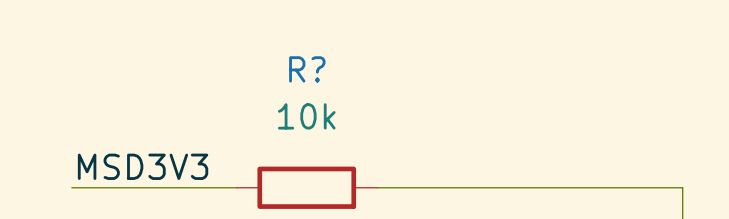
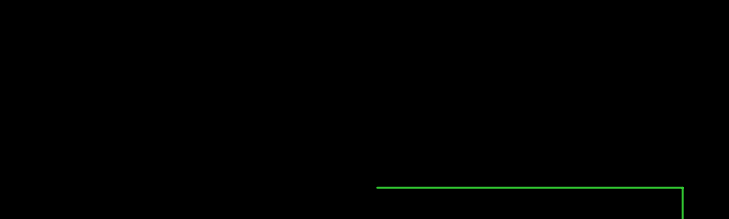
label: MSD3V3 (143, 166) -> none
wire: (71, 187) (236, 187) -> none
R?: 10k (306, 187) -> none

